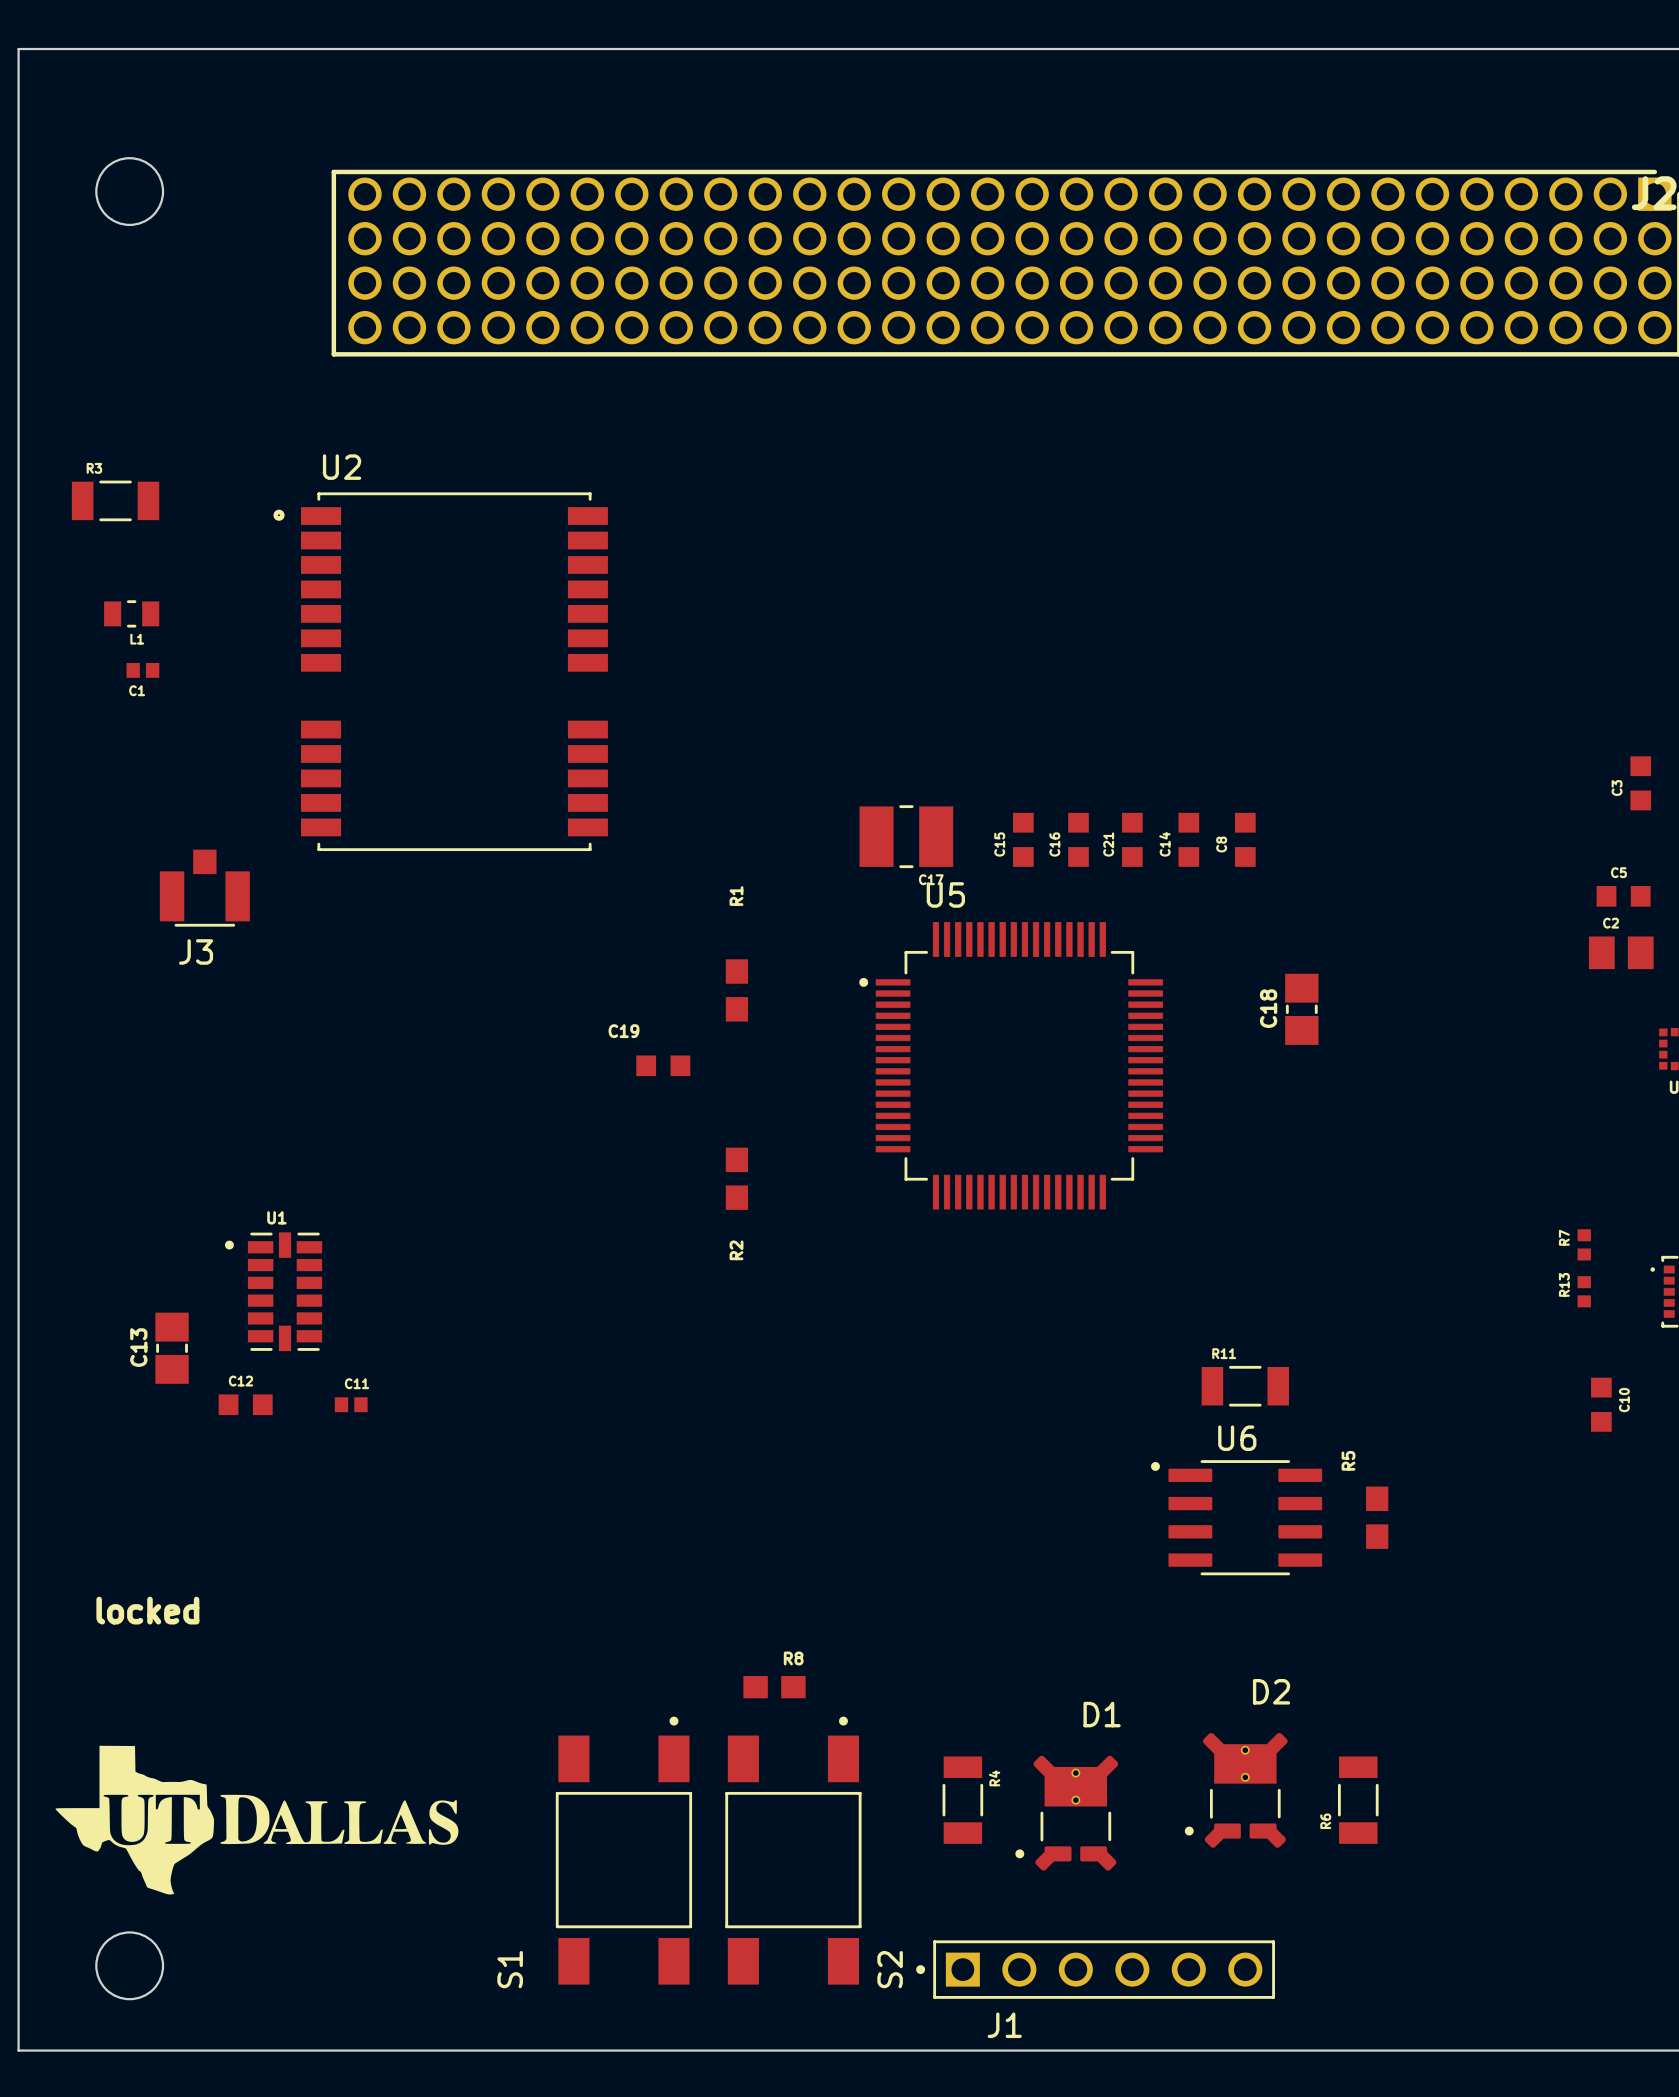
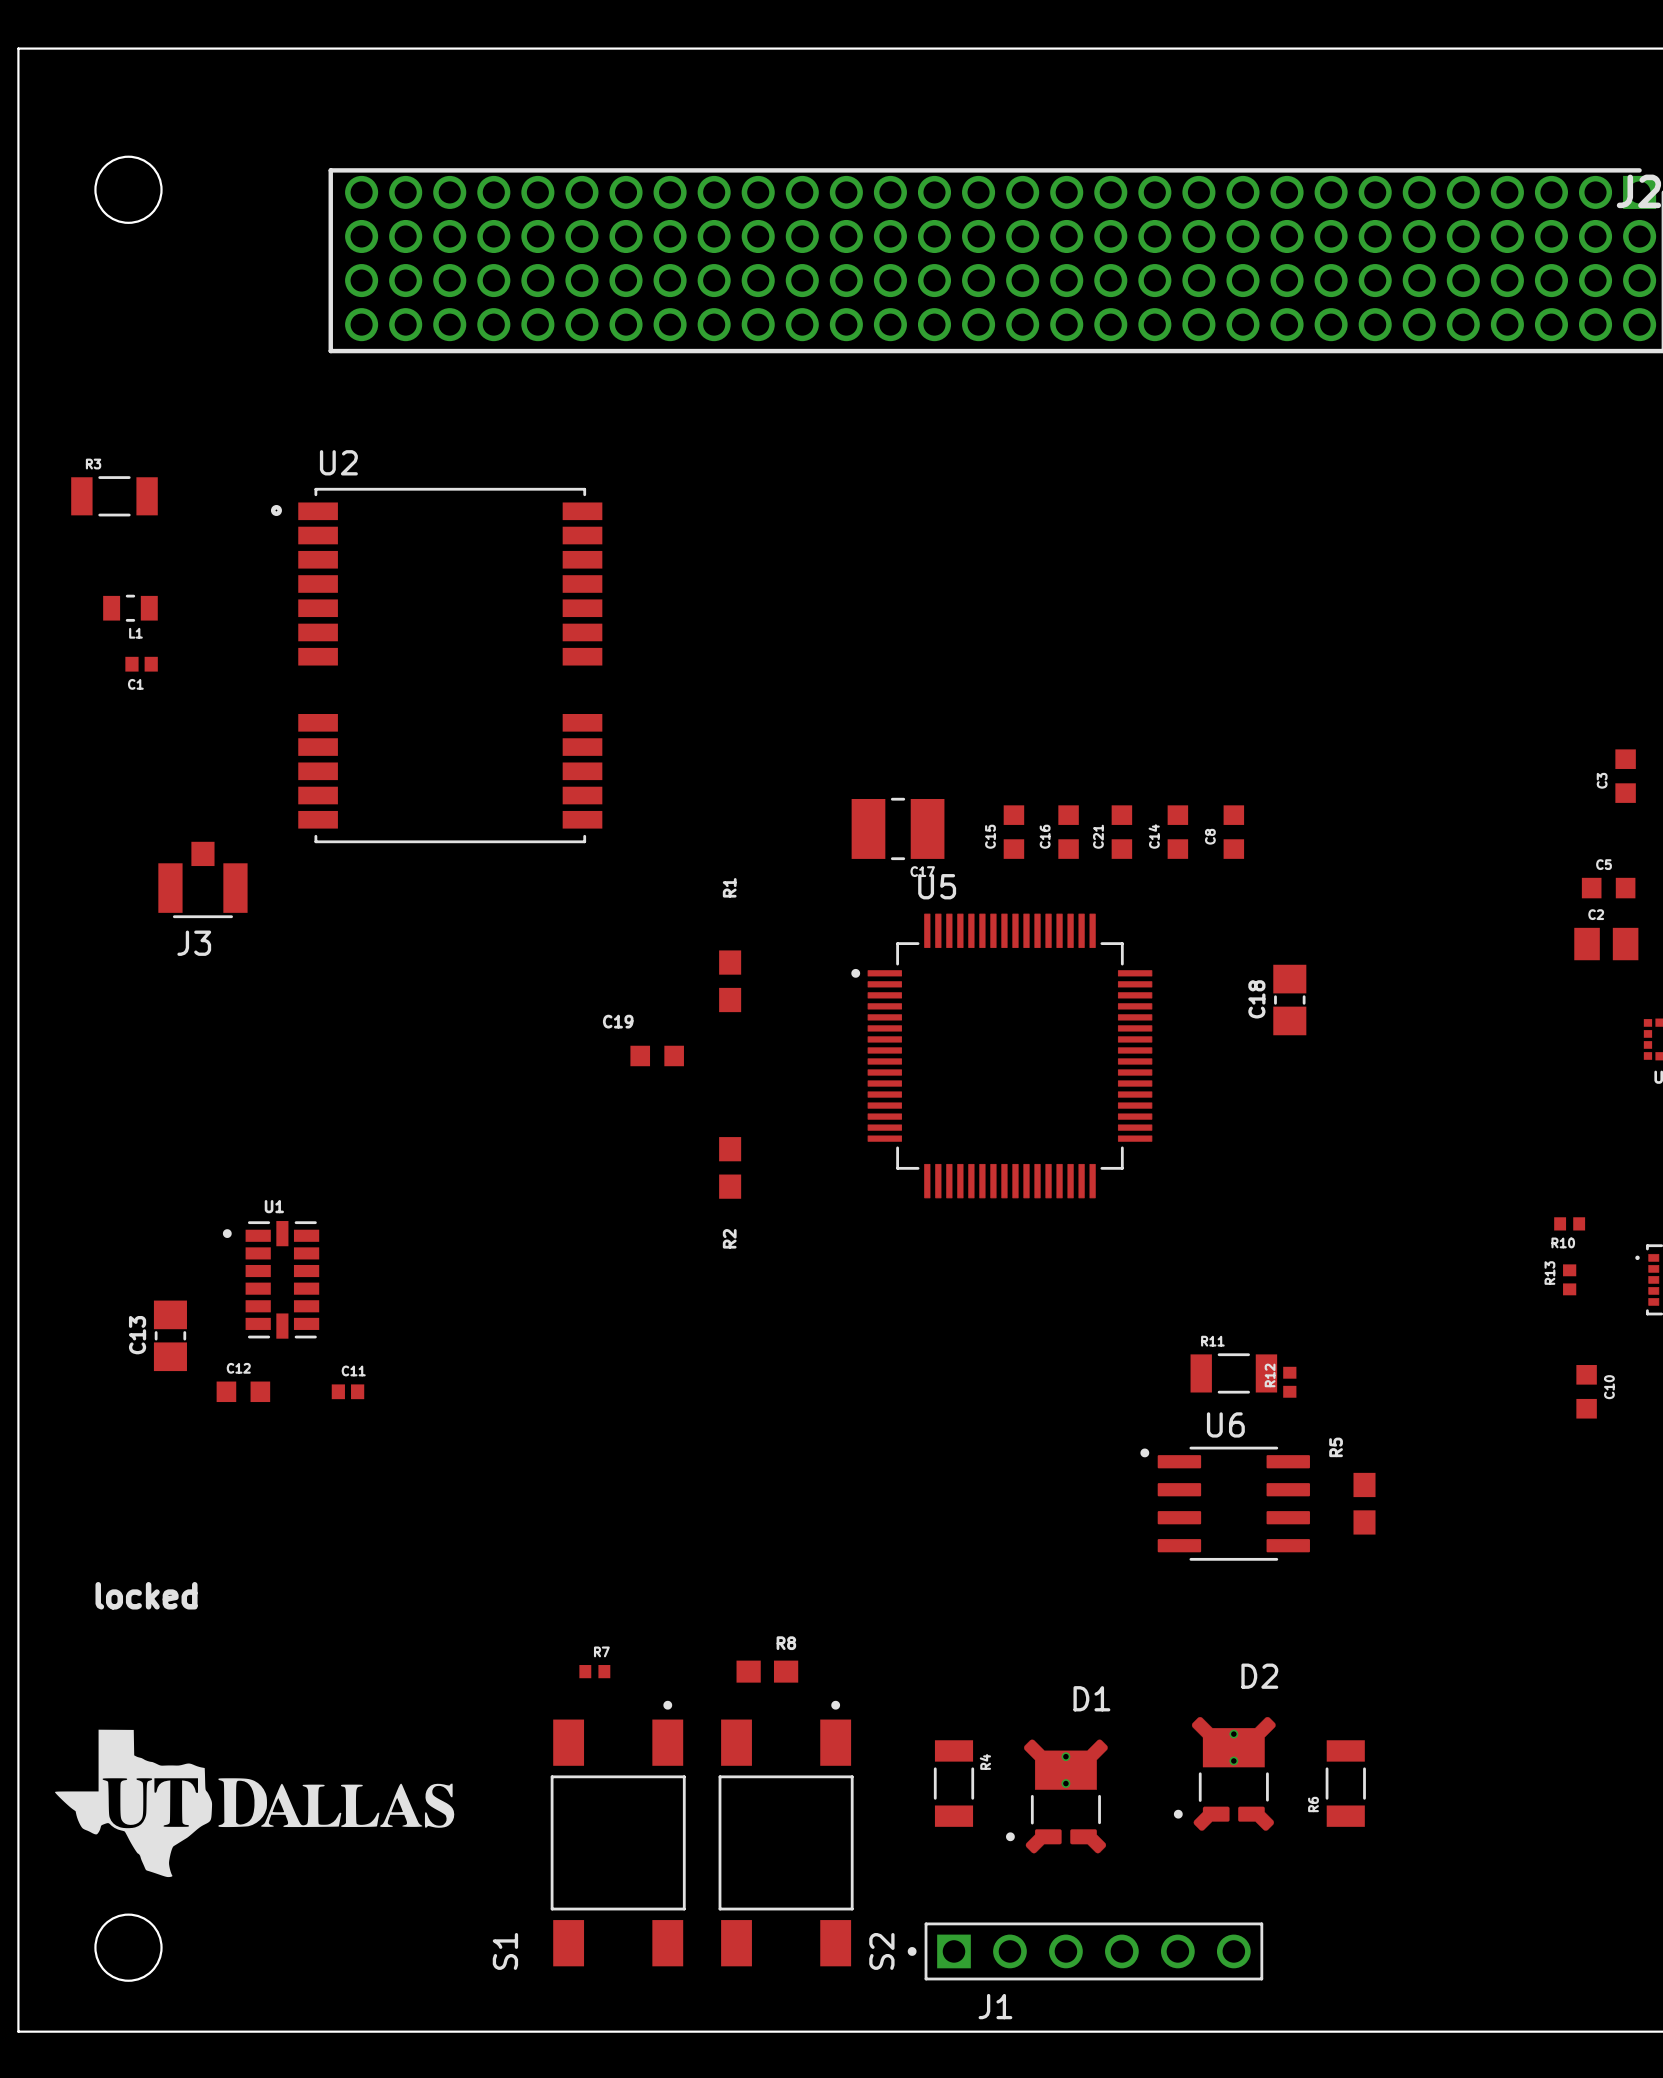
R10: none -> (1569, 1223)
R7 rotation: 0° (1584, 1244) -> 90° clockwise (594, 1671)
R7 position: (1584, 1244) -> (594, 1671)
R12: none -> (1289, 1382)

